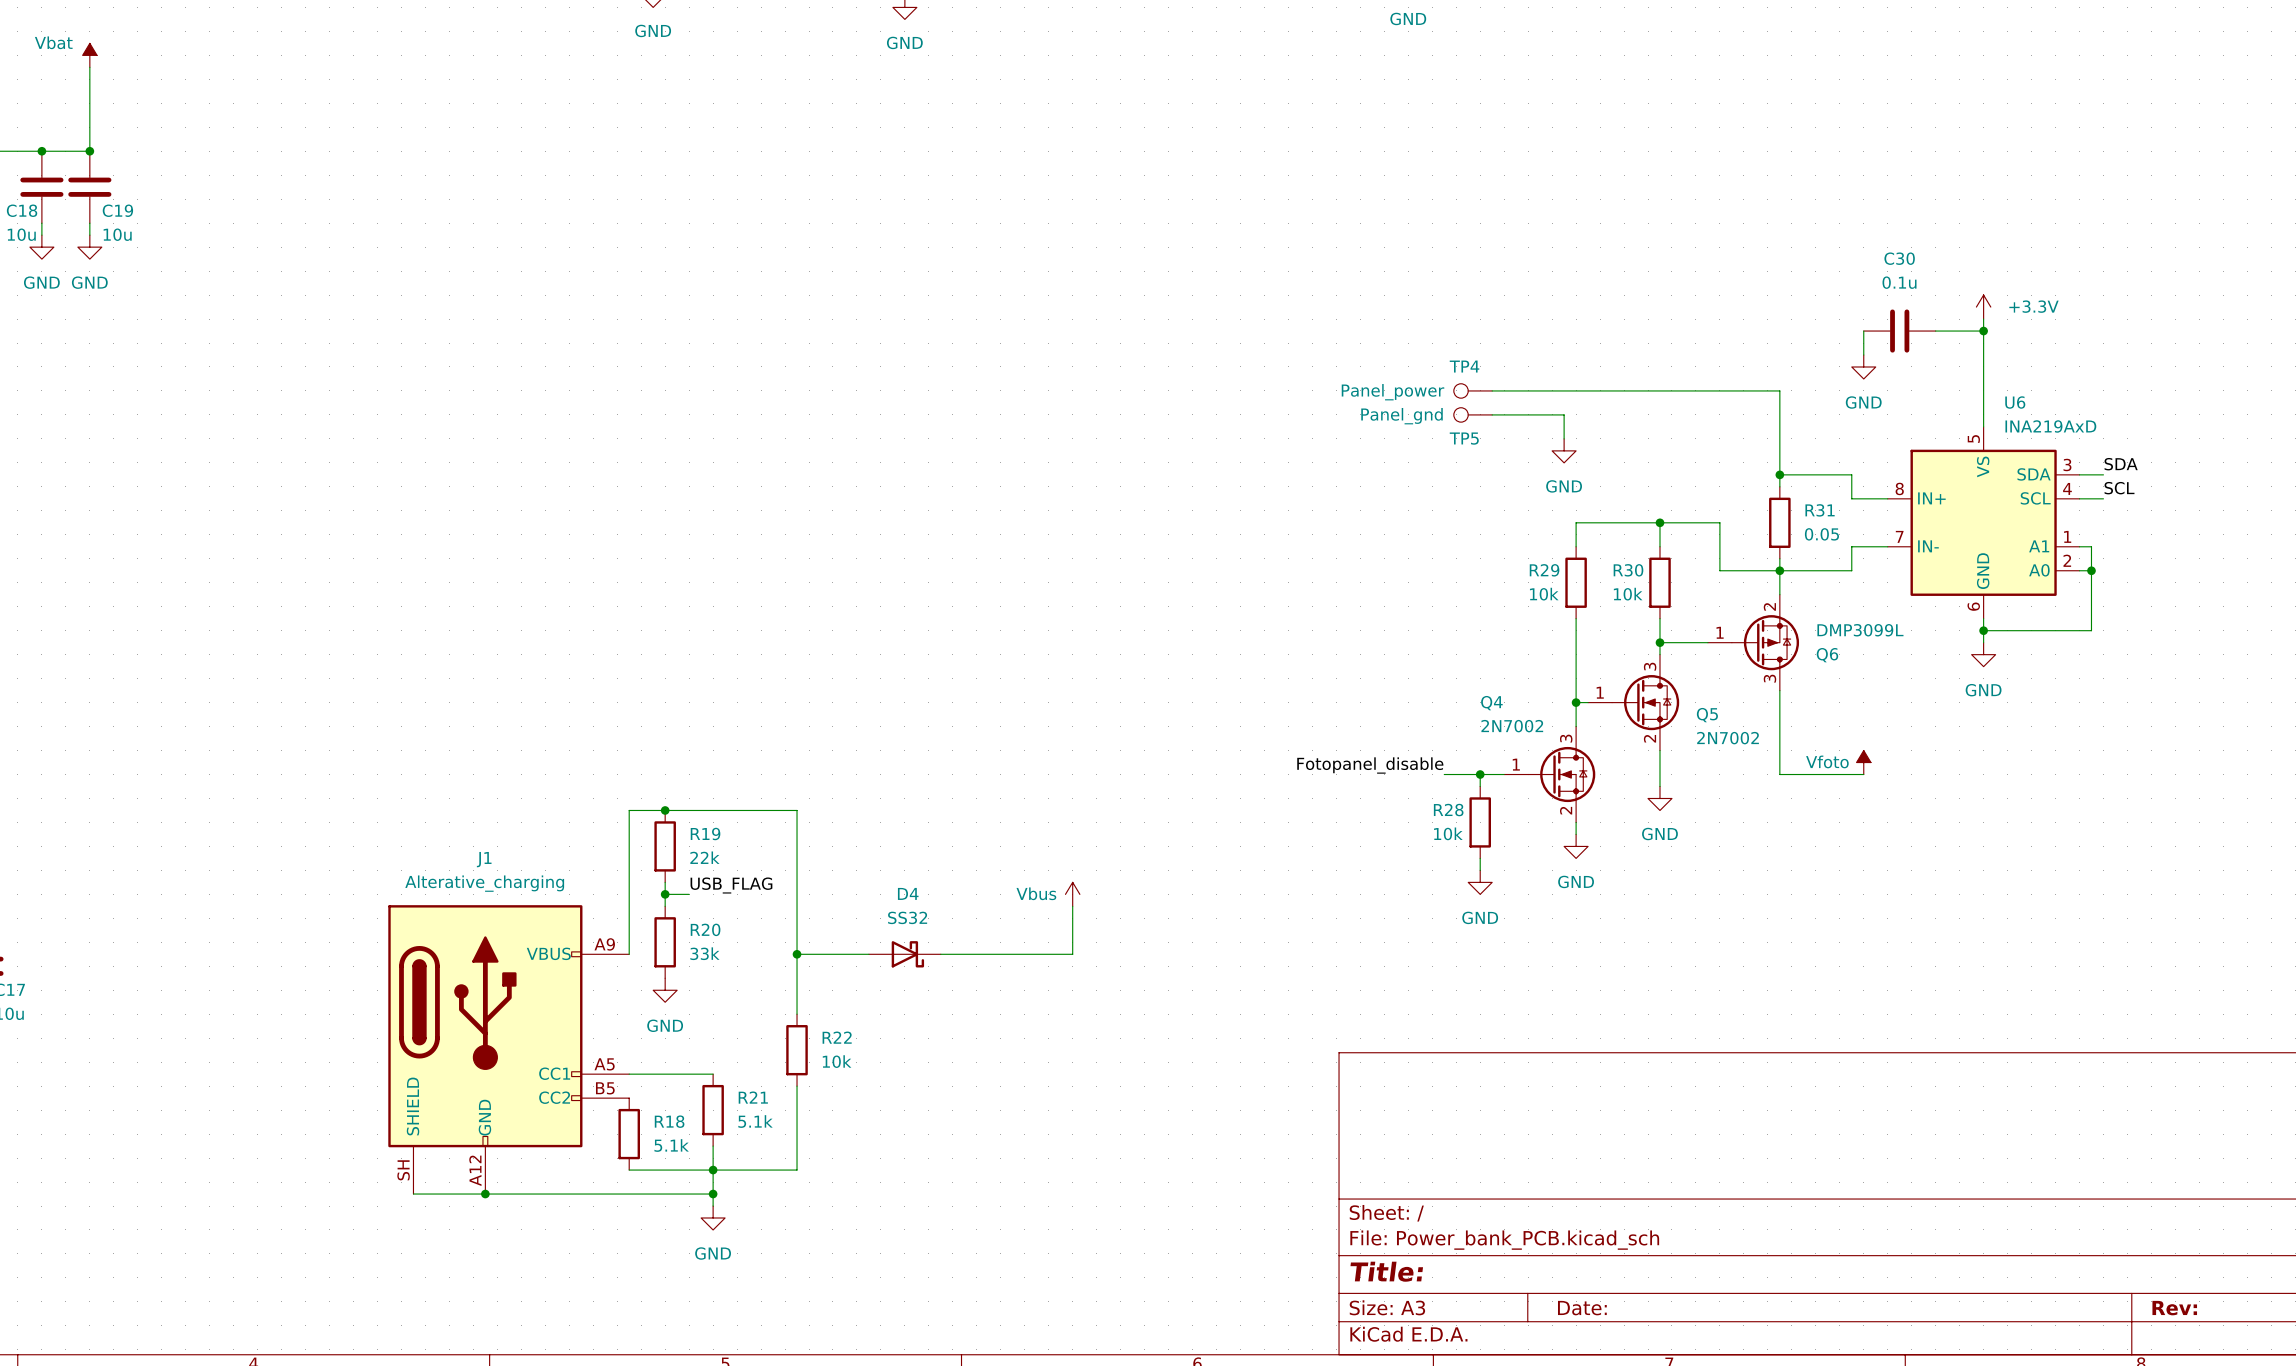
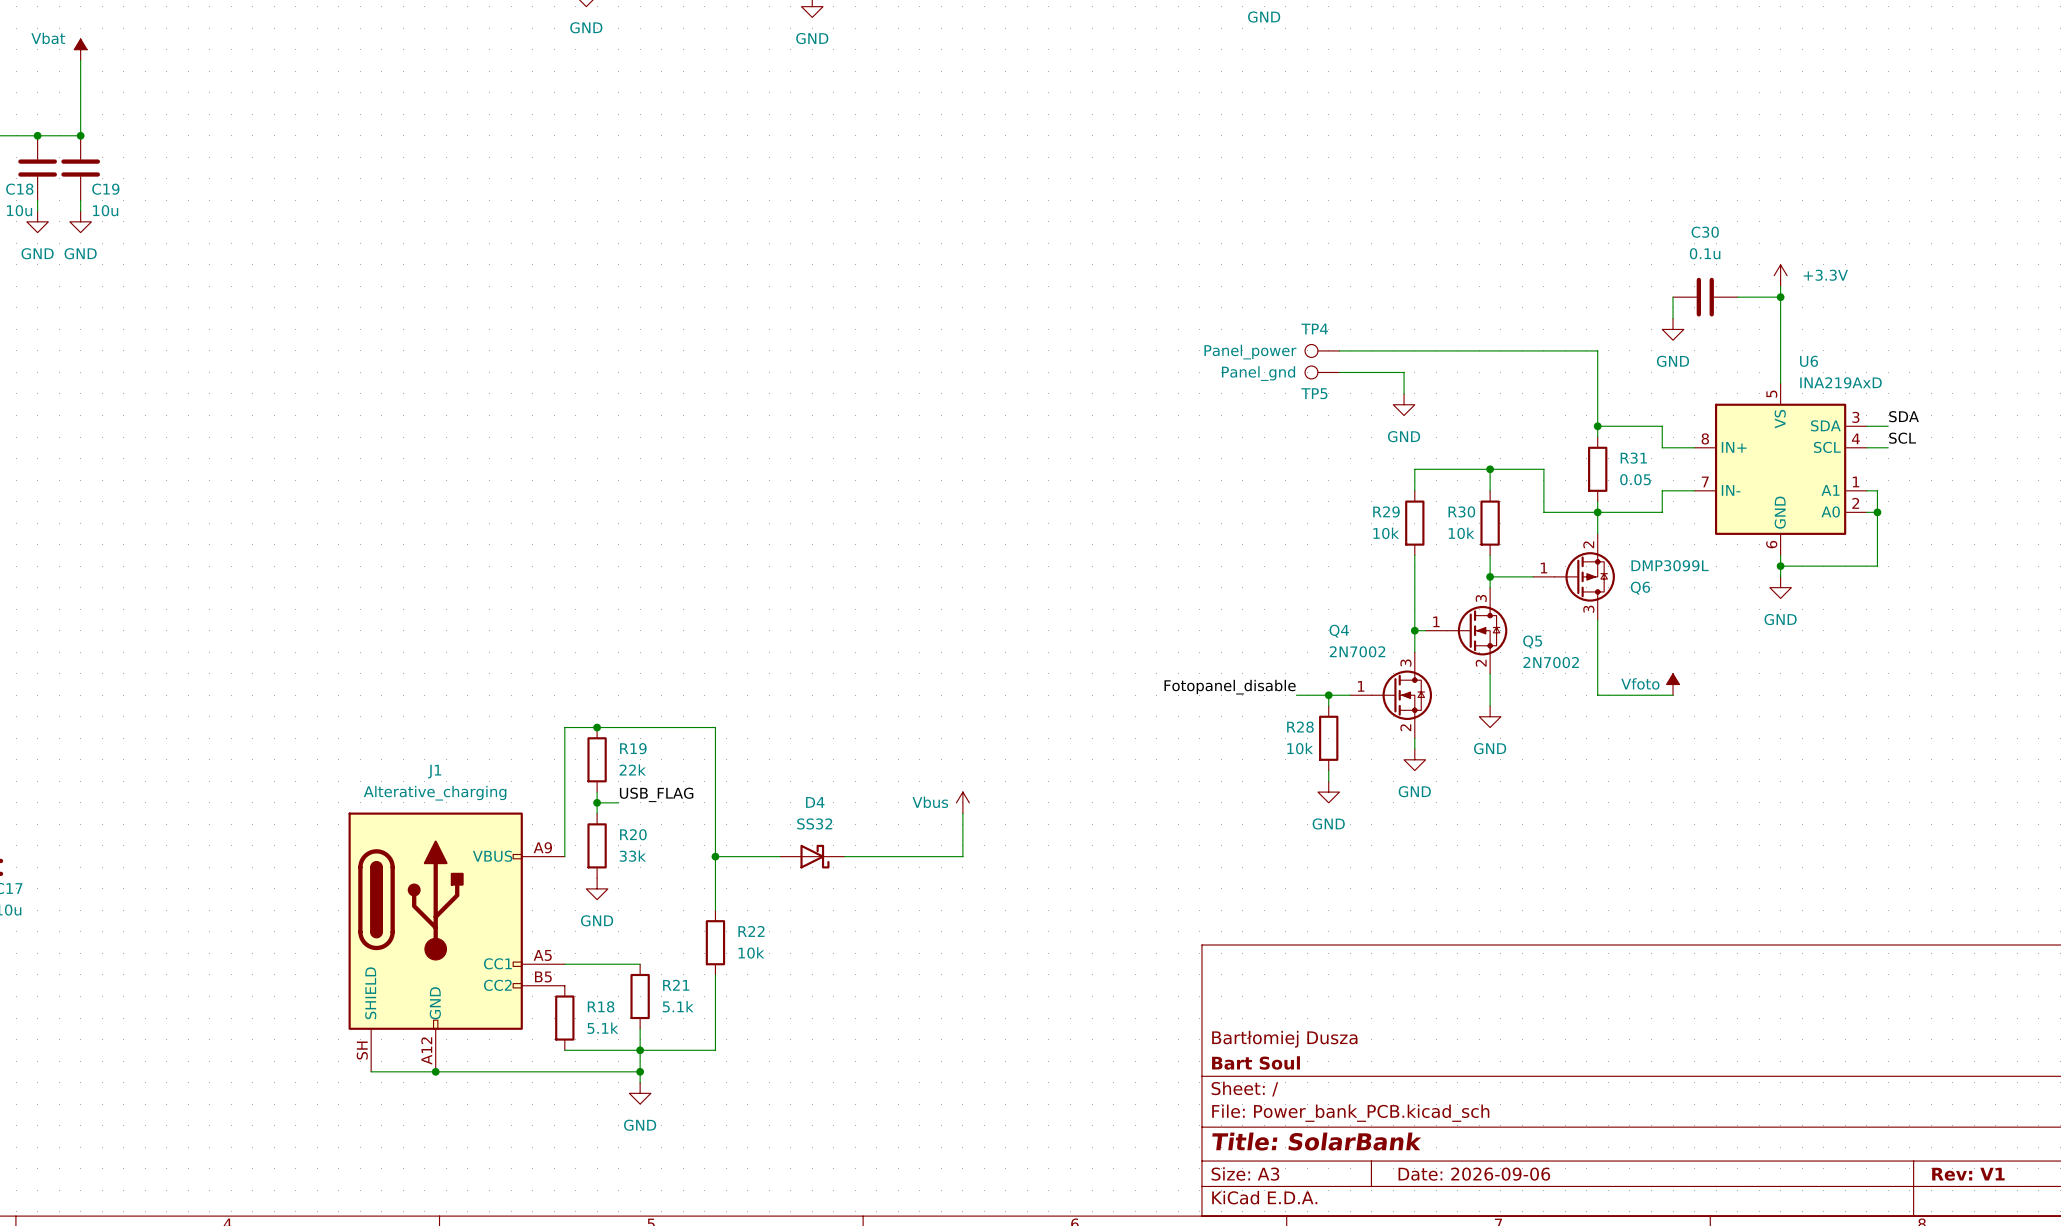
title block: none -> Bartłomiej Dusza (1284, 1039)
title block: none -> Bart Soul (1256, 1062)
title block: Title: (1386, 1271) -> Title: SolarBank (1316, 1141)
title block: Date: (1582, 1308) -> Date: 2026-09-06 (1474, 1174)
title block: Rev: (2174, 1308) -> Rev: V1 (1968, 1174)

